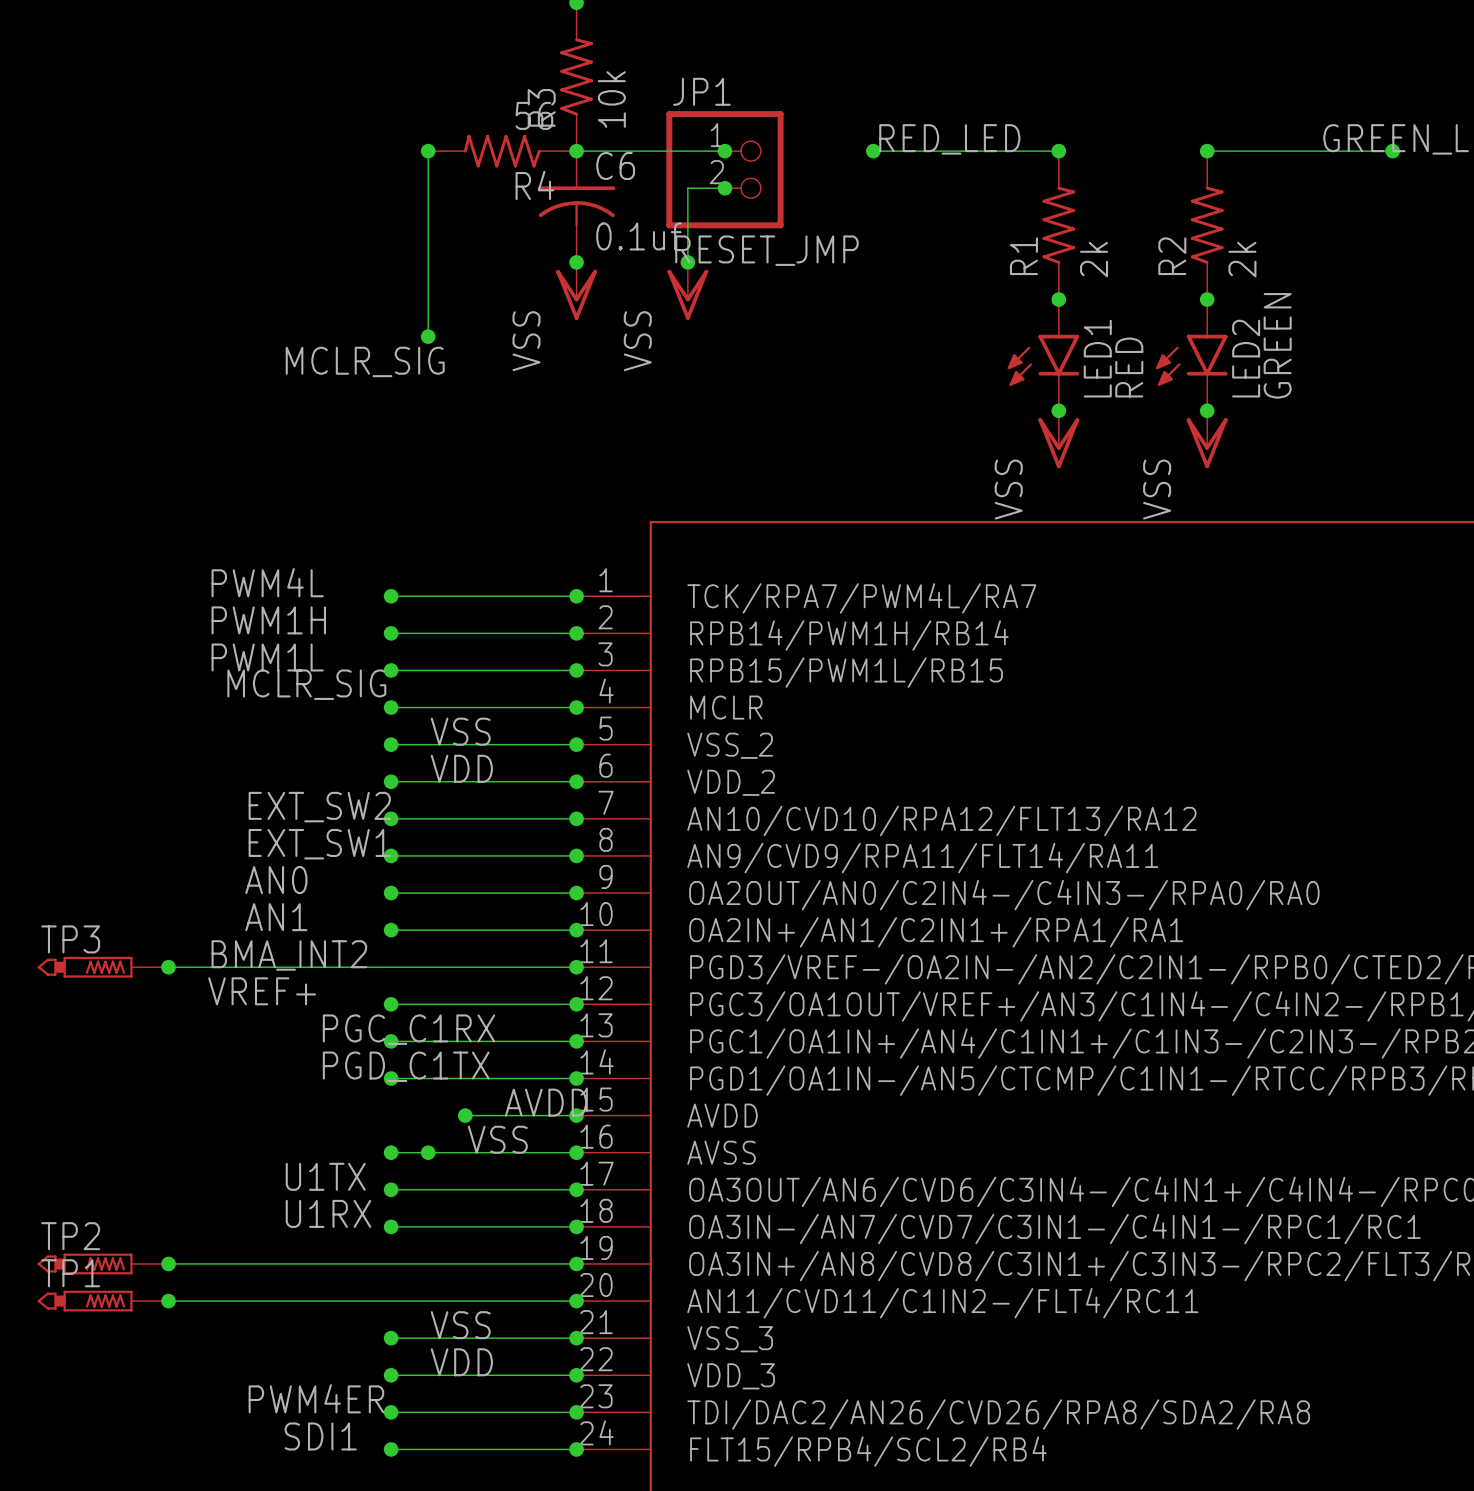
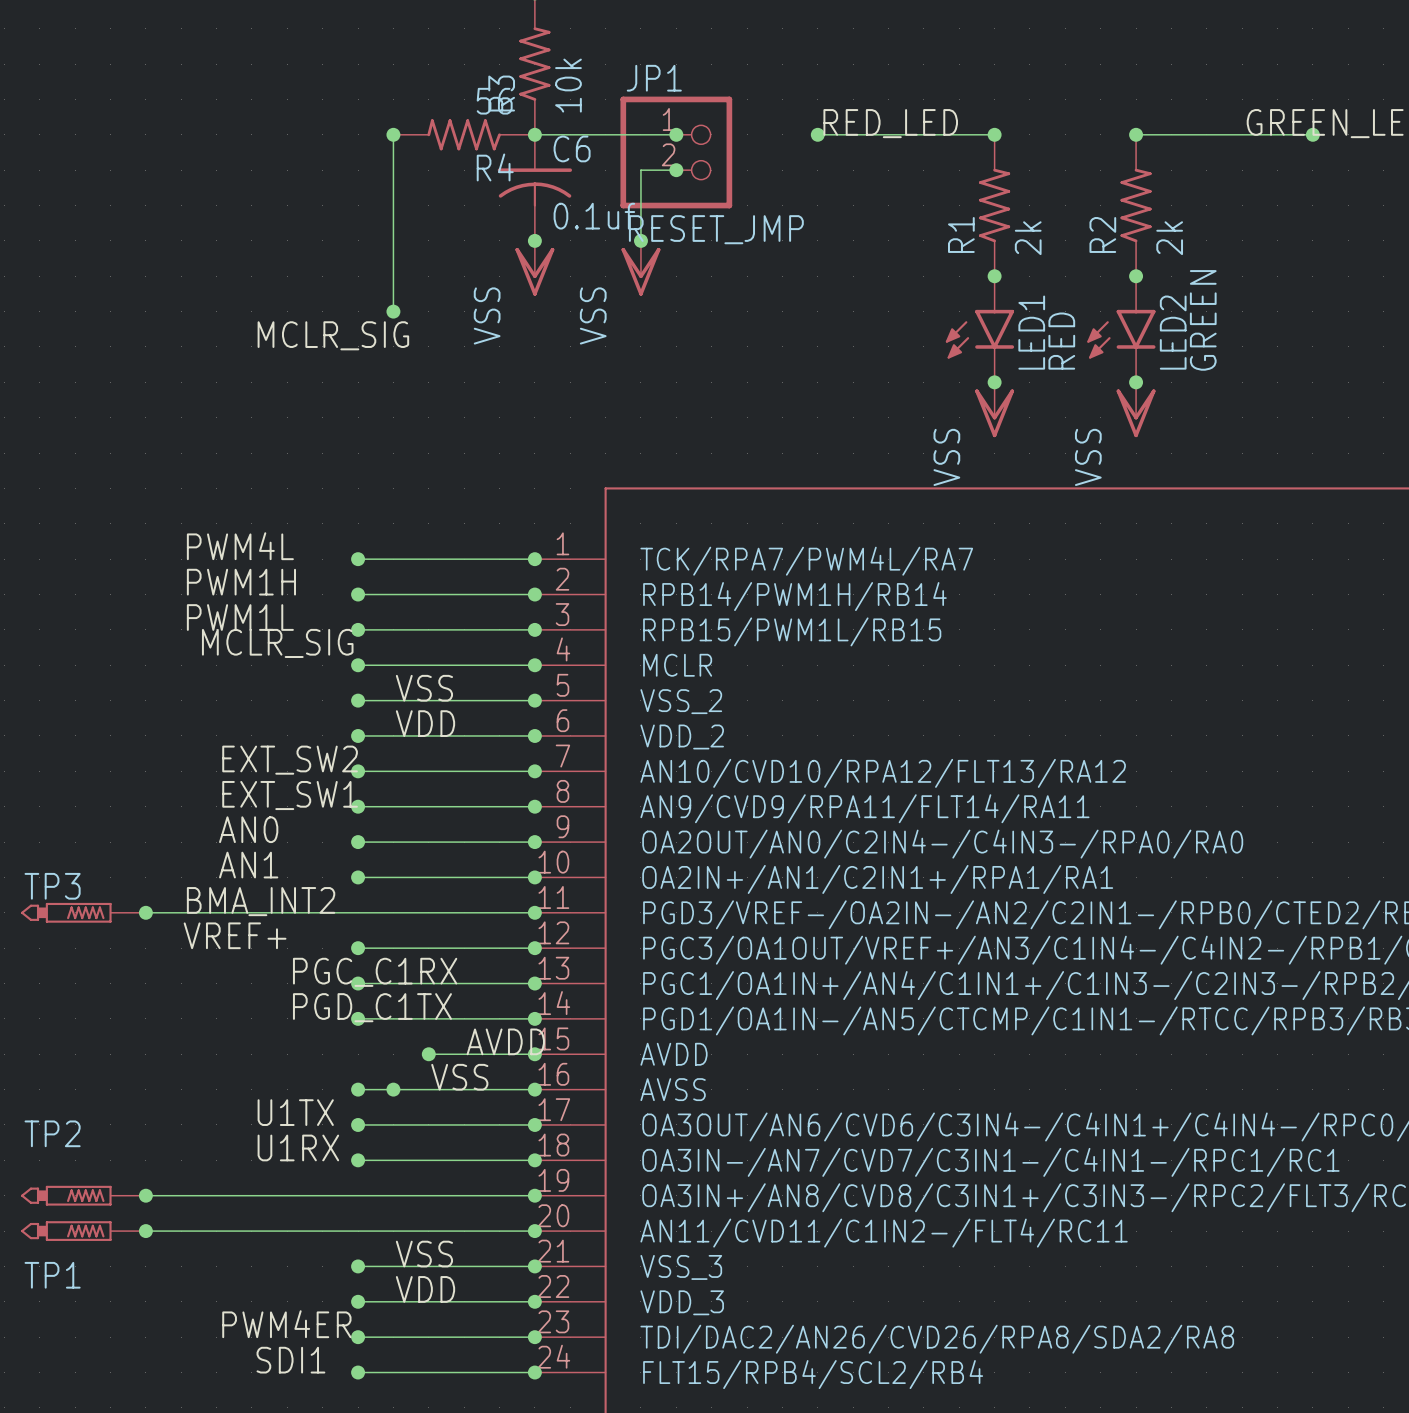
TP2 name position: TP2 (70, 1236) -> TP2 (52, 1133)
TP1 name position: TP1 (70, 1273) -> TP1 (52, 1275)

